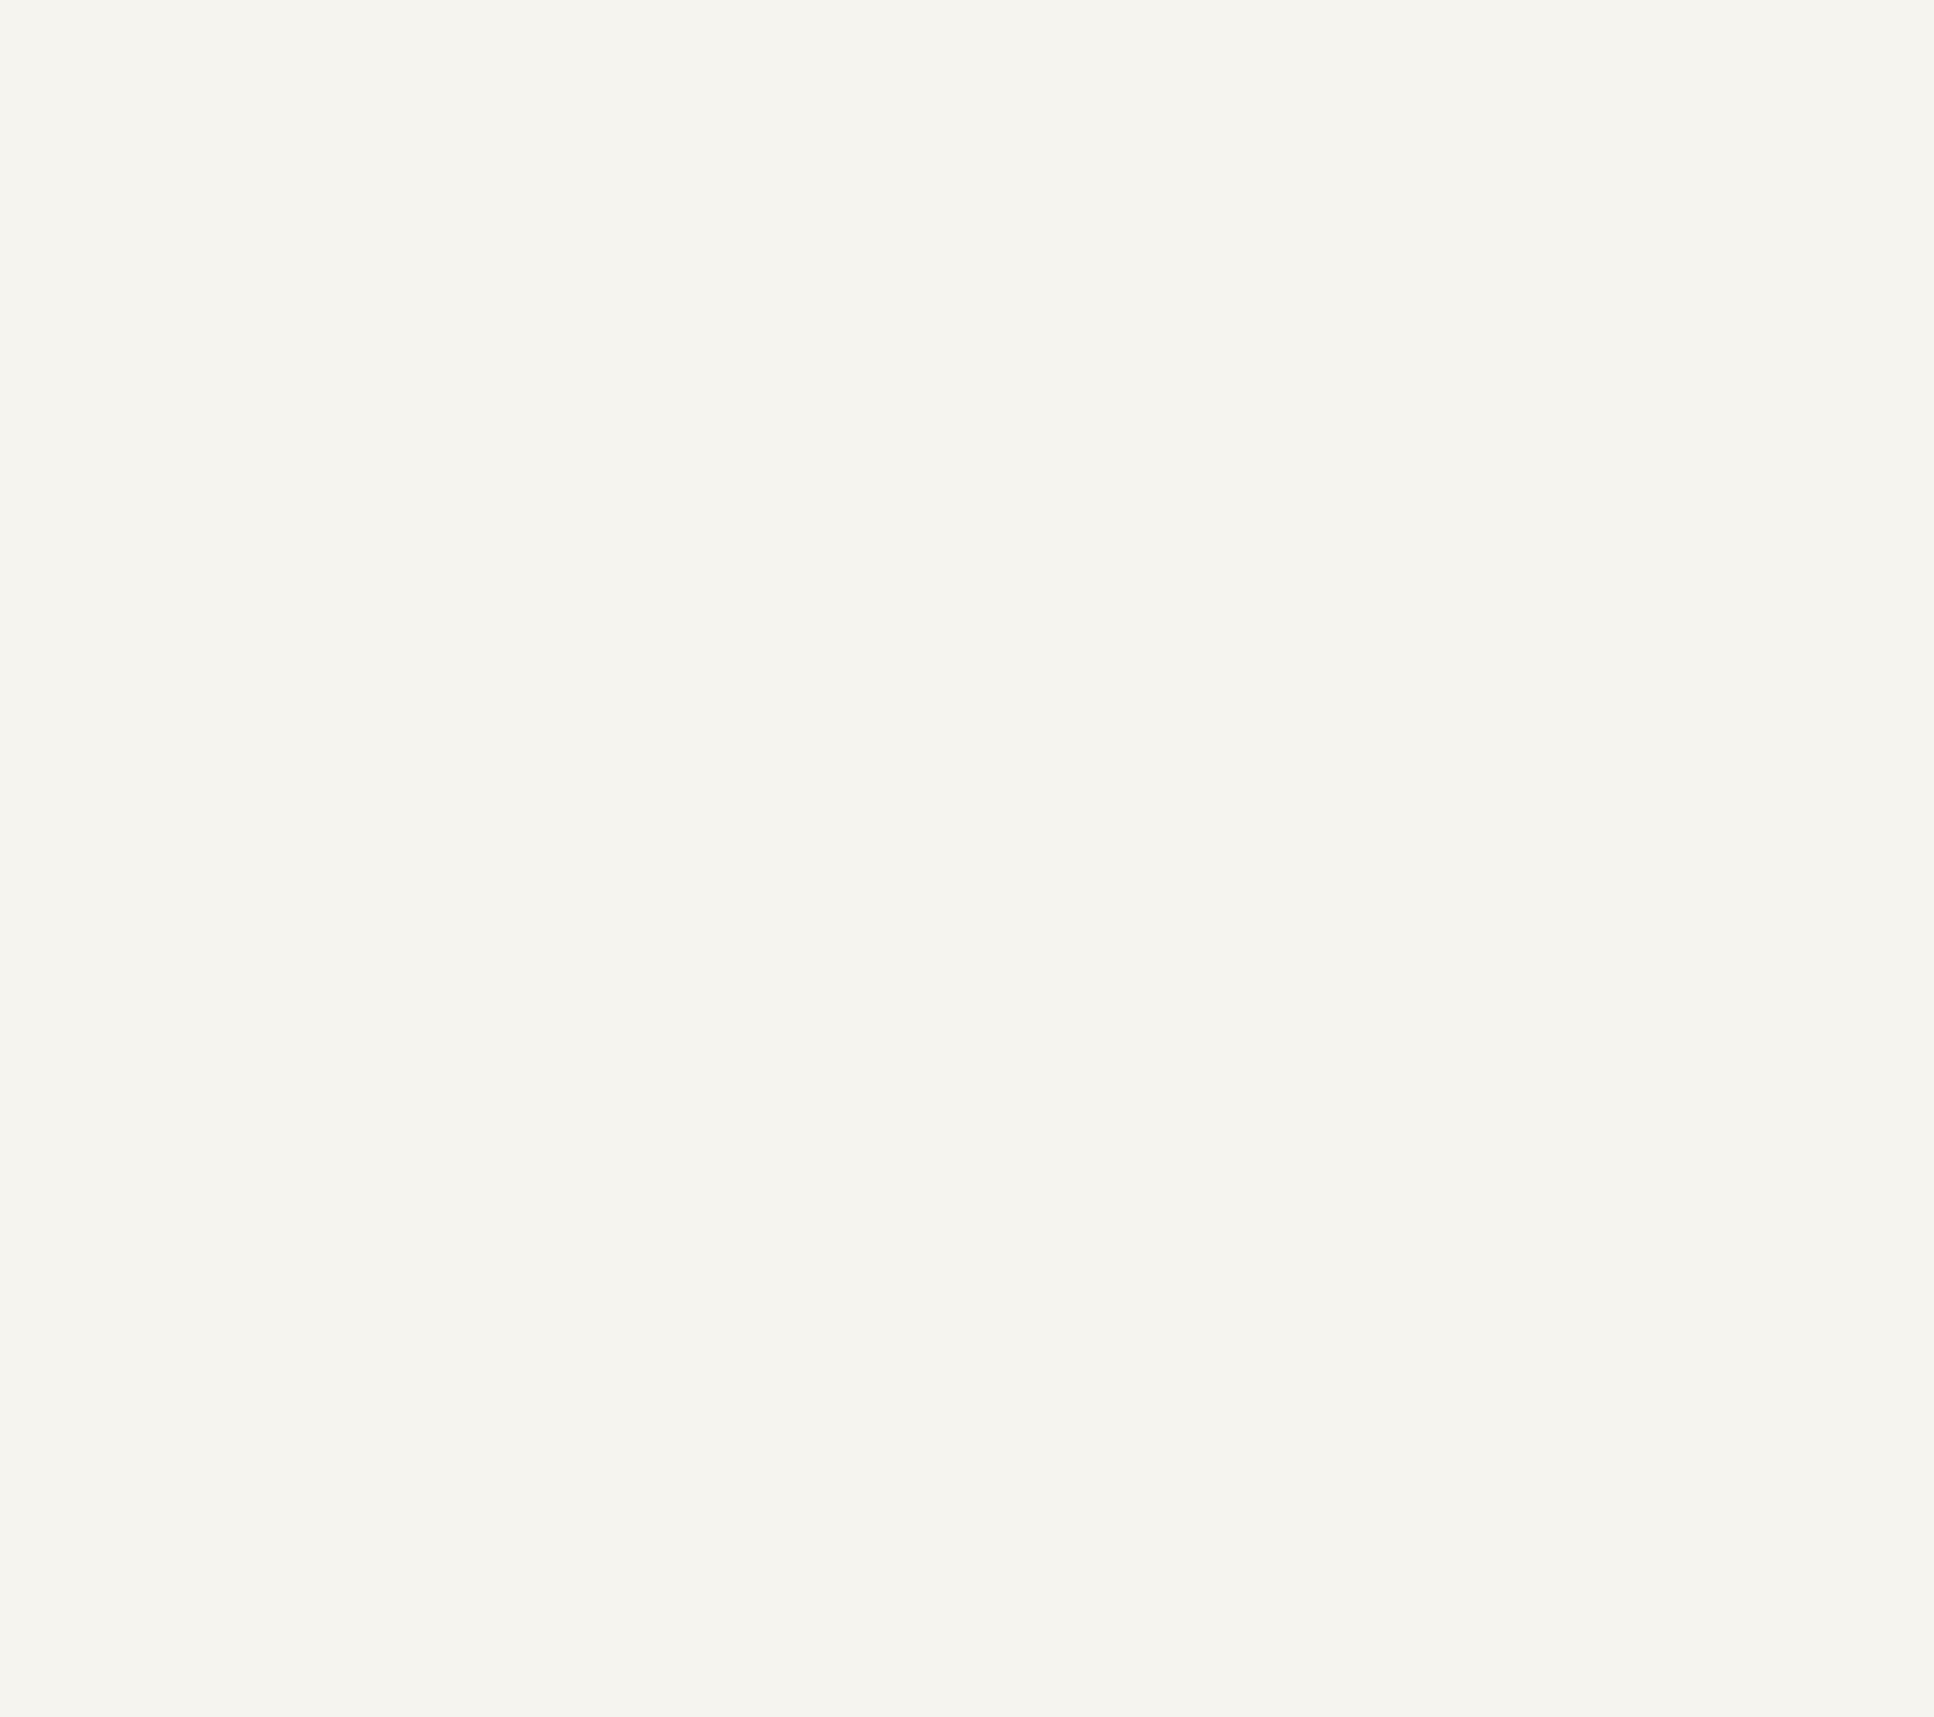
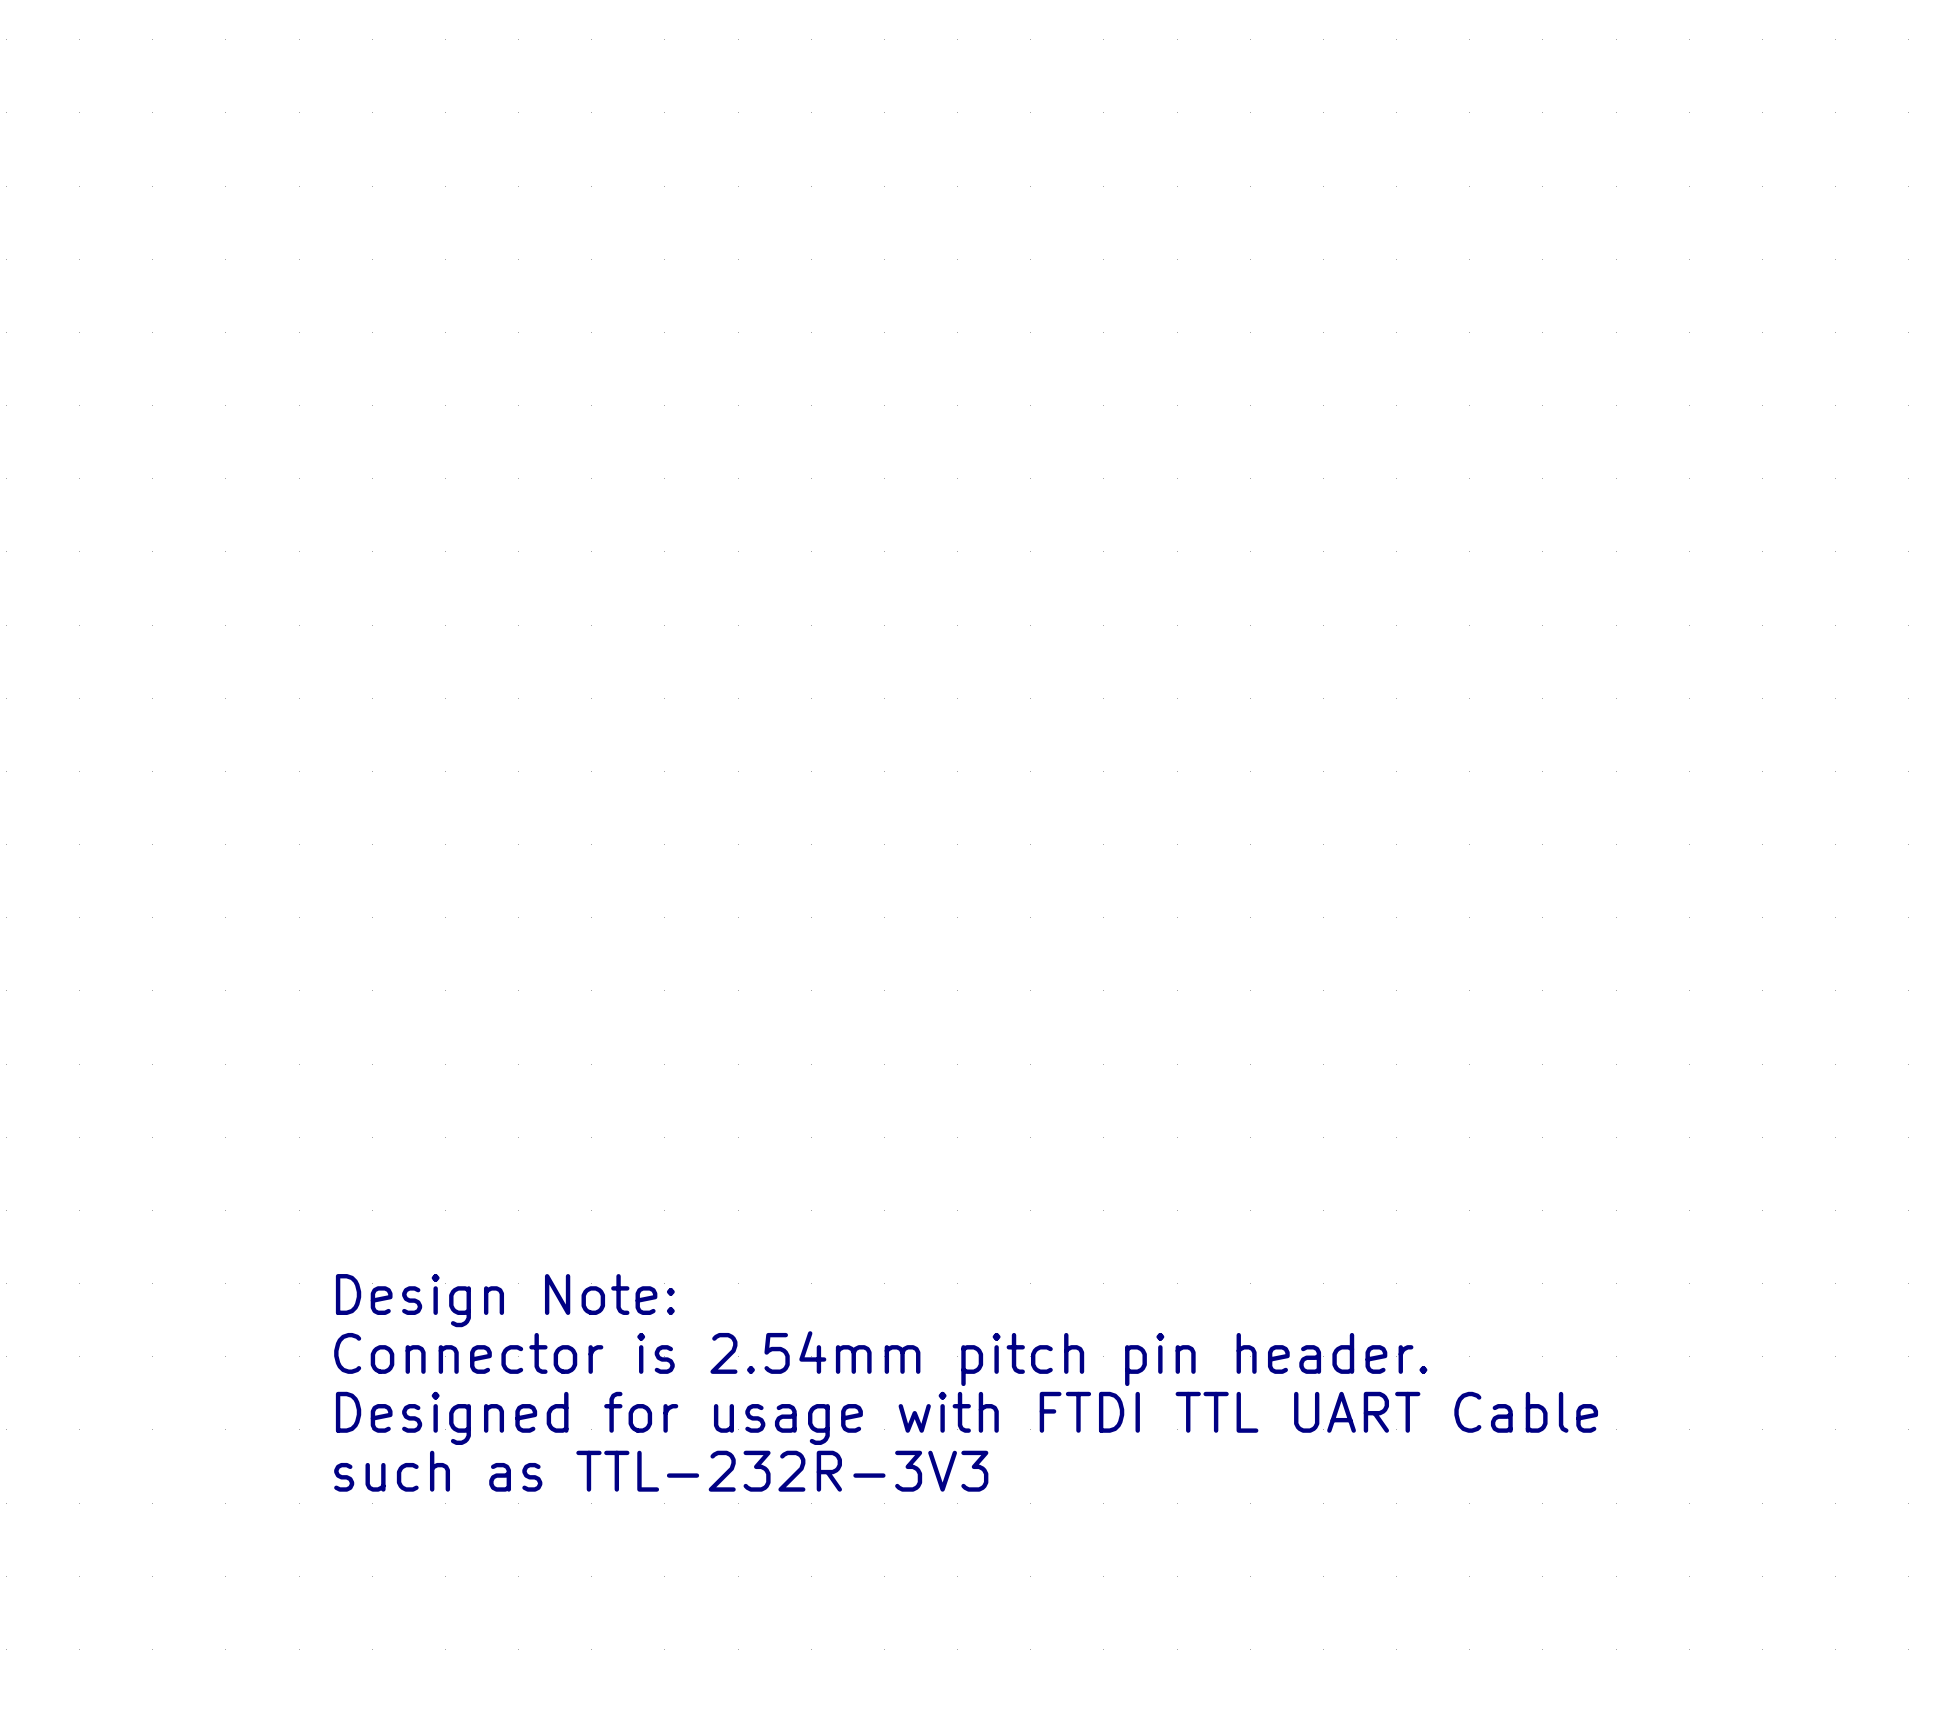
text: none -> Design Note: (505, 1300)
text: none -> Connector is 2.54mm pitch pin header. (880, 1358)
text: none -> Designed for usage with FTDI TTL UART Cable (966, 1418)
text: none -> such as TTL-232R-3V3 (661, 1471)

